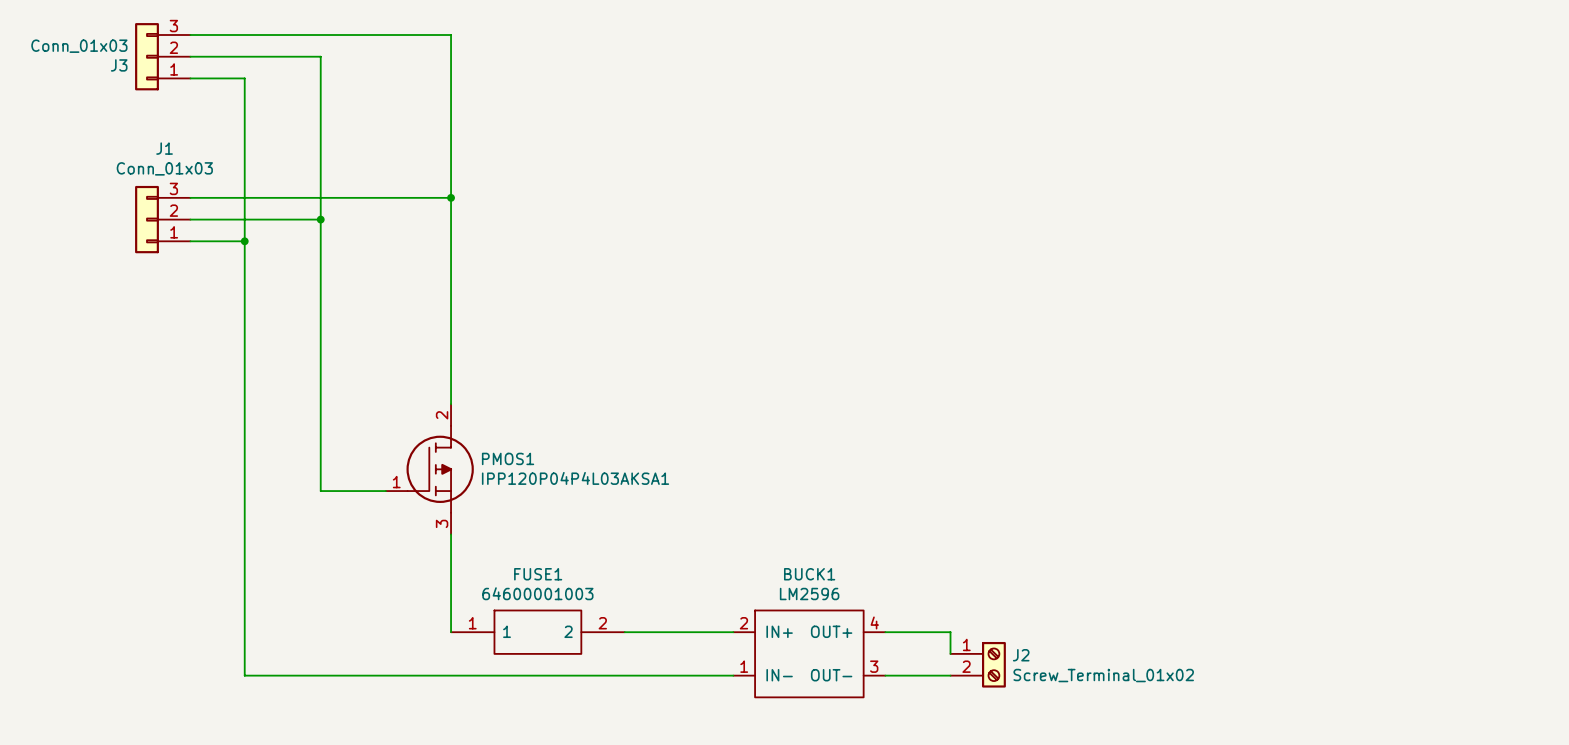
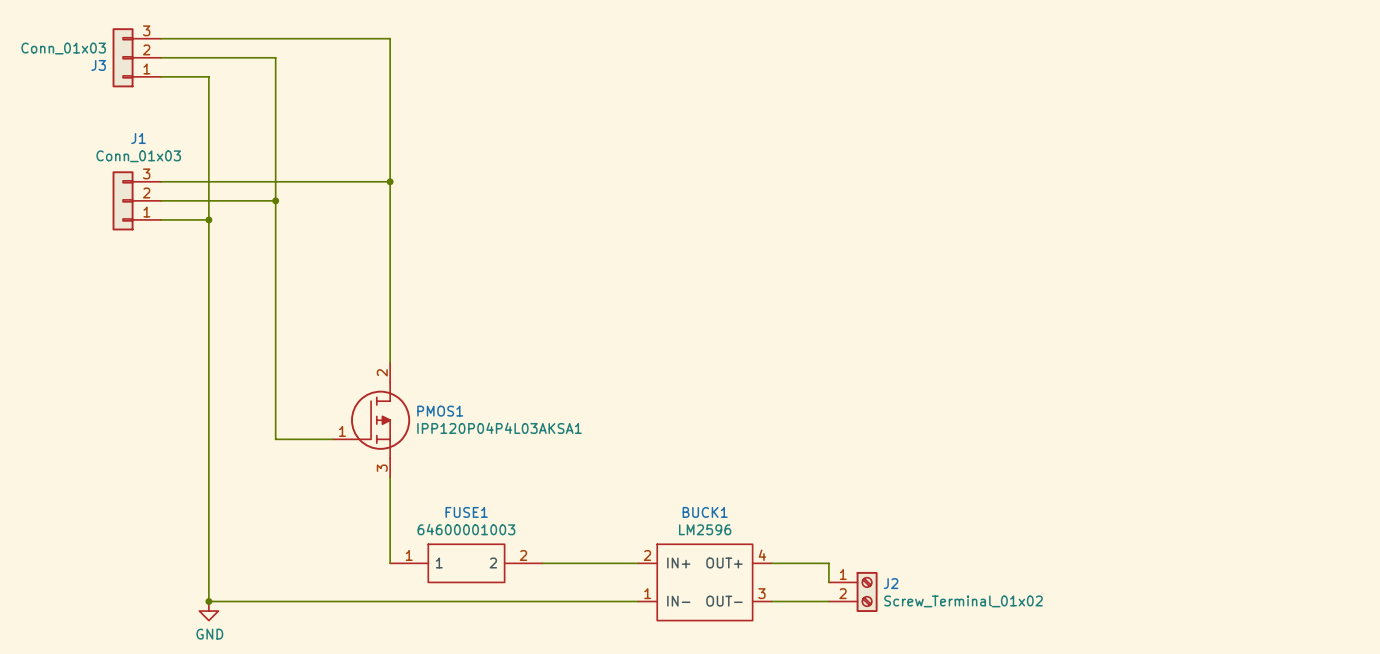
junction: none -> (208, 601)
power symbol: none -> GND (208, 611)

